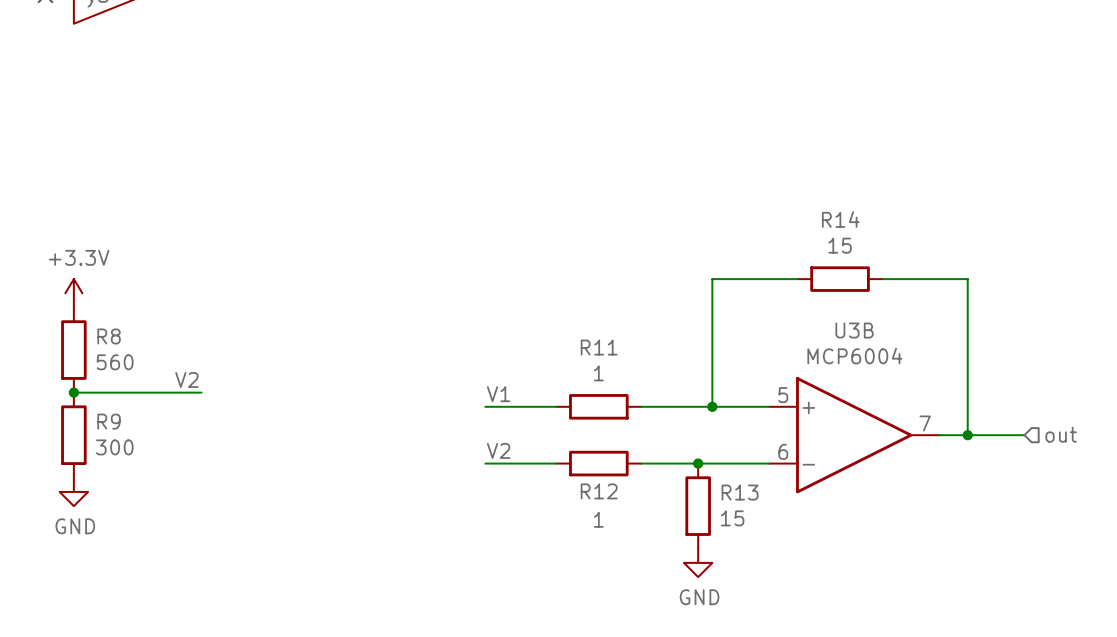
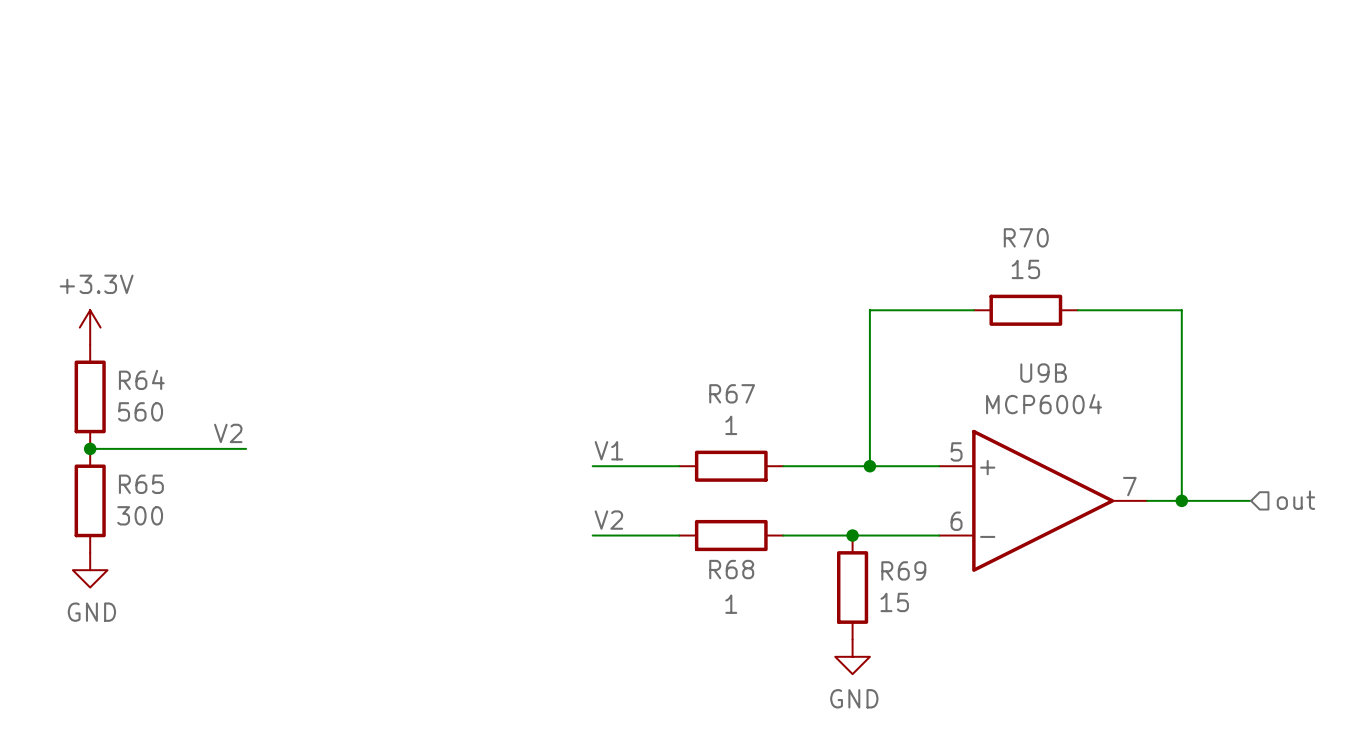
R14 name: R14 (840, 219) -> R70 (1026, 237)
U3B name: U3B (854, 330) -> U9B (1043, 373)
R8 name: R8 (109, 336) -> R64 (141, 379)
R11 name: R11 (599, 347) -> R67 (732, 393)
R9 name: R9 (109, 421) -> R65 (141, 484)
R12 name: R12 (599, 491) -> R68 (731, 569)
R13 name: R13 (740, 492) -> R69 (903, 570)

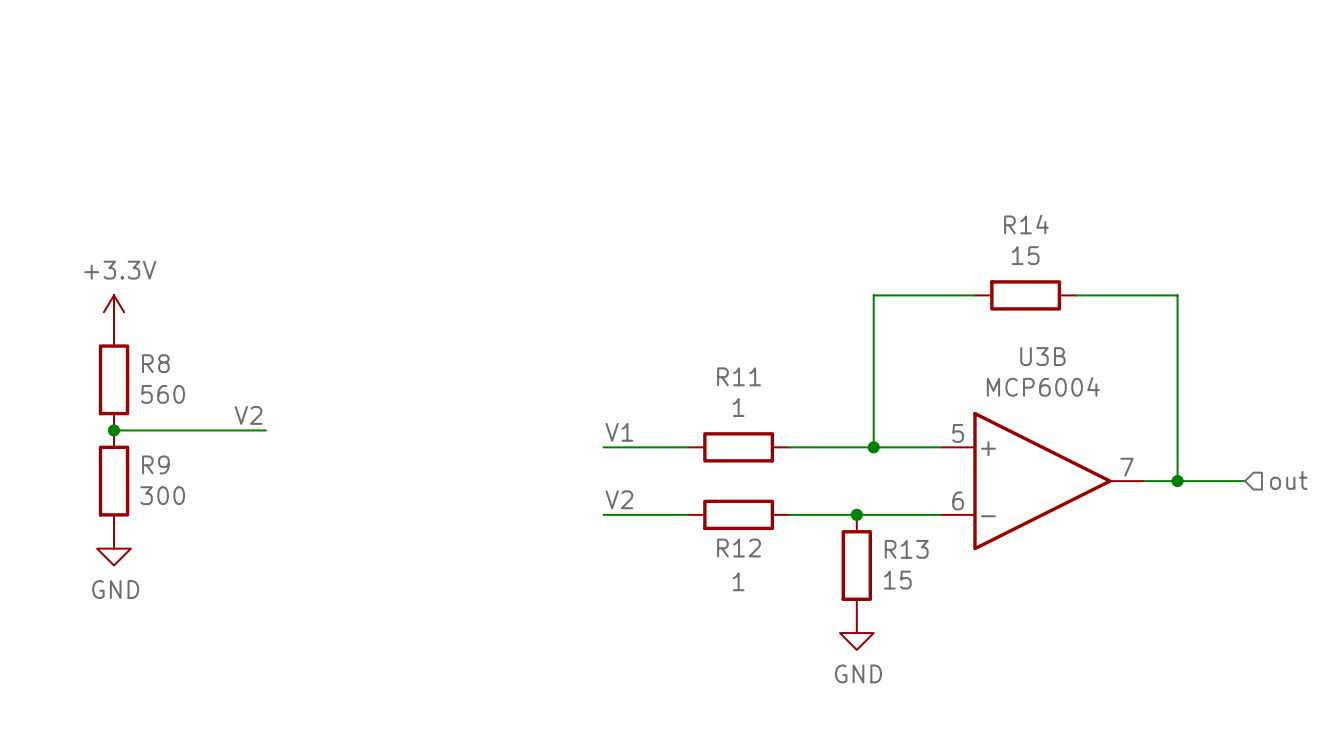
R70 name: R70 (1026, 237) -> R14 (1026, 224)
U9B name: U9B (1043, 373) -> U3B (1042, 356)
R64 name: R64 (141, 379) -> R8 (155, 363)
R67 name: R67 (732, 393) -> R11 (739, 376)
R65 name: R65 (141, 484) -> R9 (155, 464)
R68 name: R68 (731, 569) -> R12 (739, 548)
R69 name: R69 (903, 570) -> R13 (906, 549)

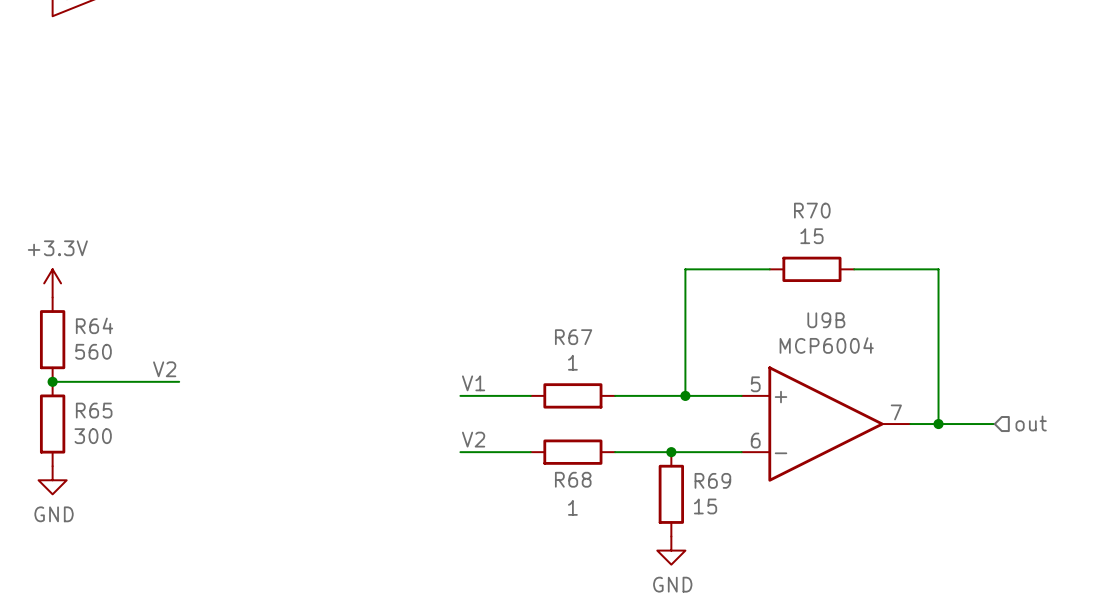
R14 name: R14 (1026, 224) -> R70 (812, 210)
U3B name: U3B (1042, 356) -> U9B (826, 320)
R8 name: R8 (155, 363) -> R64 (94, 325)
R11 name: R11 (739, 376) -> R67 (573, 337)
R9 name: R9 (155, 464) -> R65 (94, 410)
R12 name: R12 (739, 548) -> R68 (573, 479)
R13 name: R13 (906, 549) -> R69 (712, 480)

